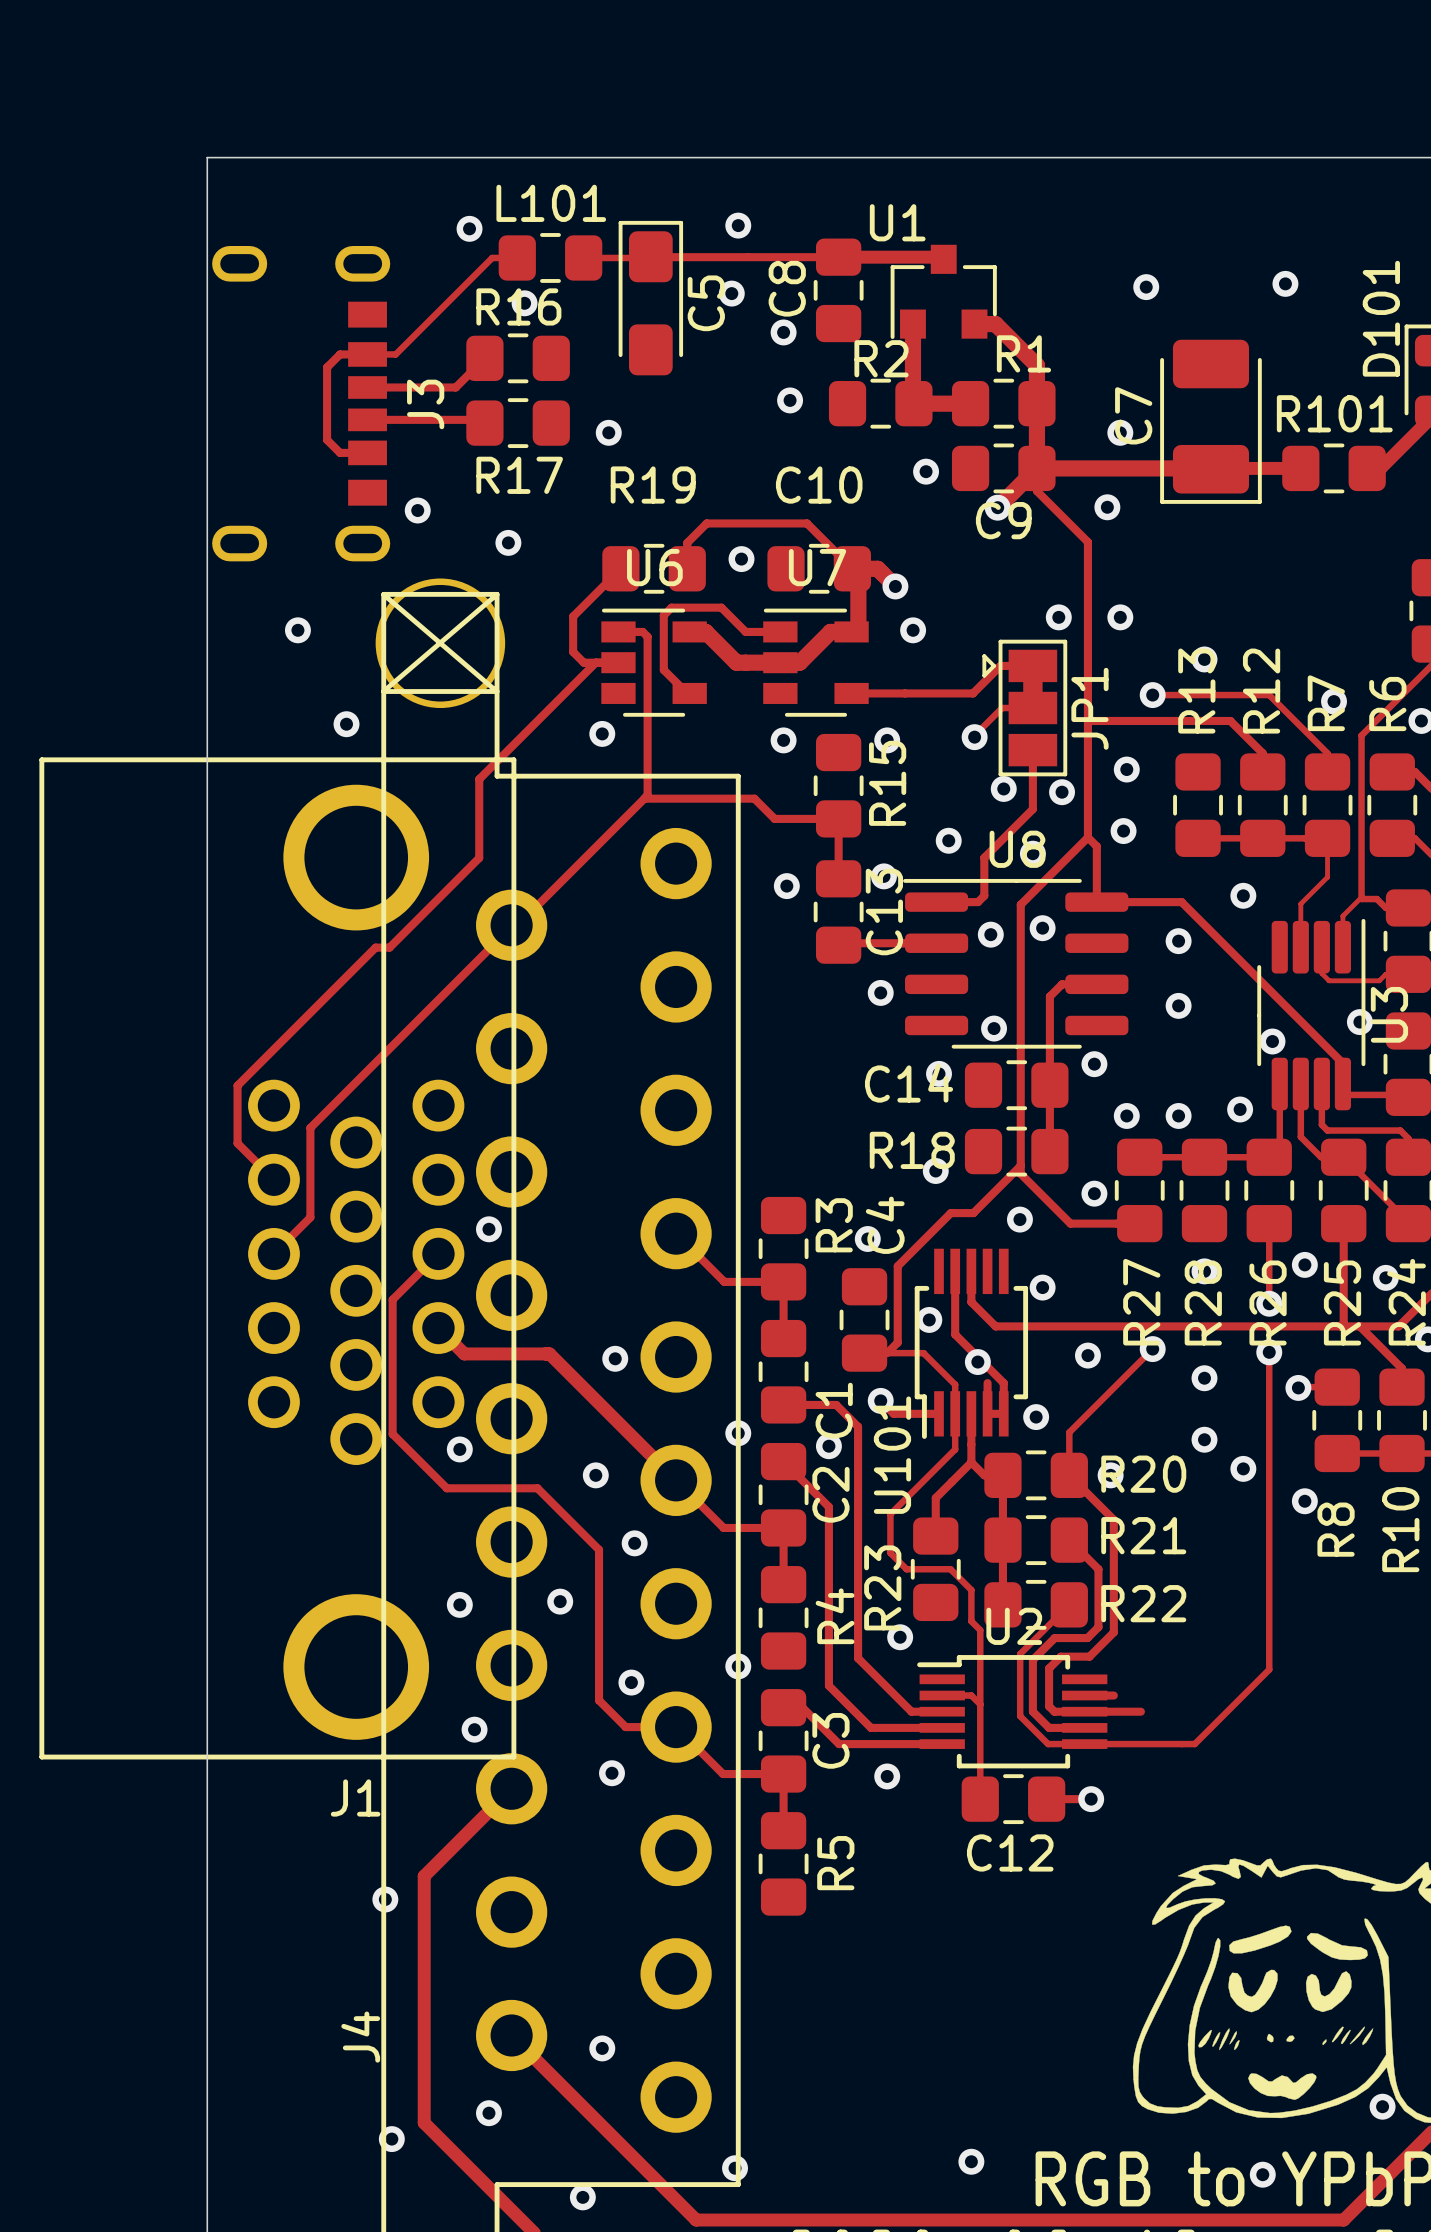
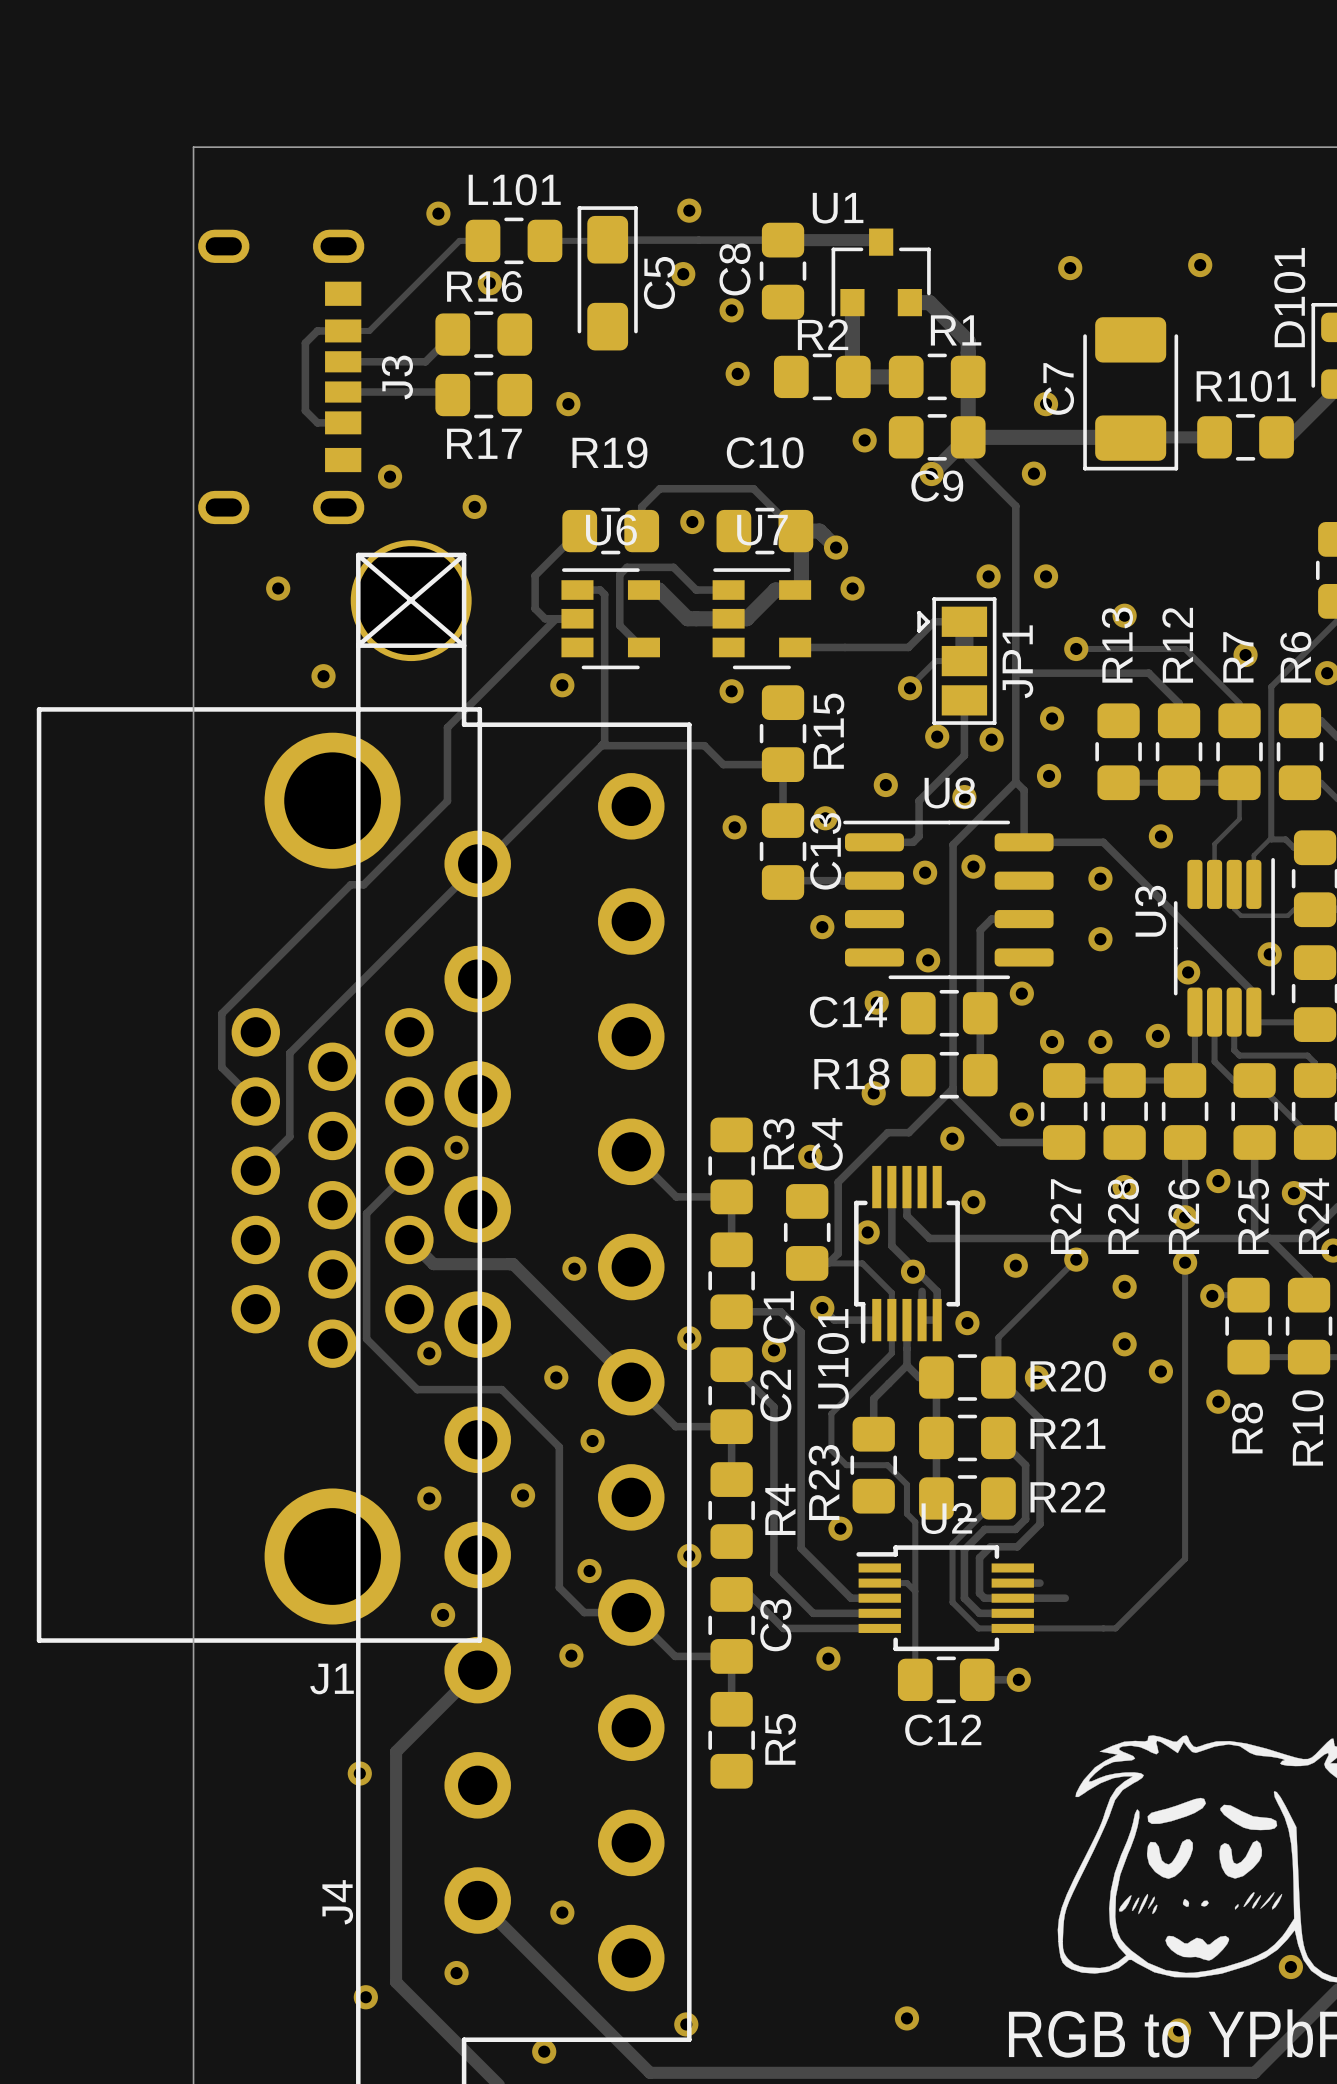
via: (887, 740) -> none
U3 name position: U3 (1389, 1014) -> U3 (1150, 911)

